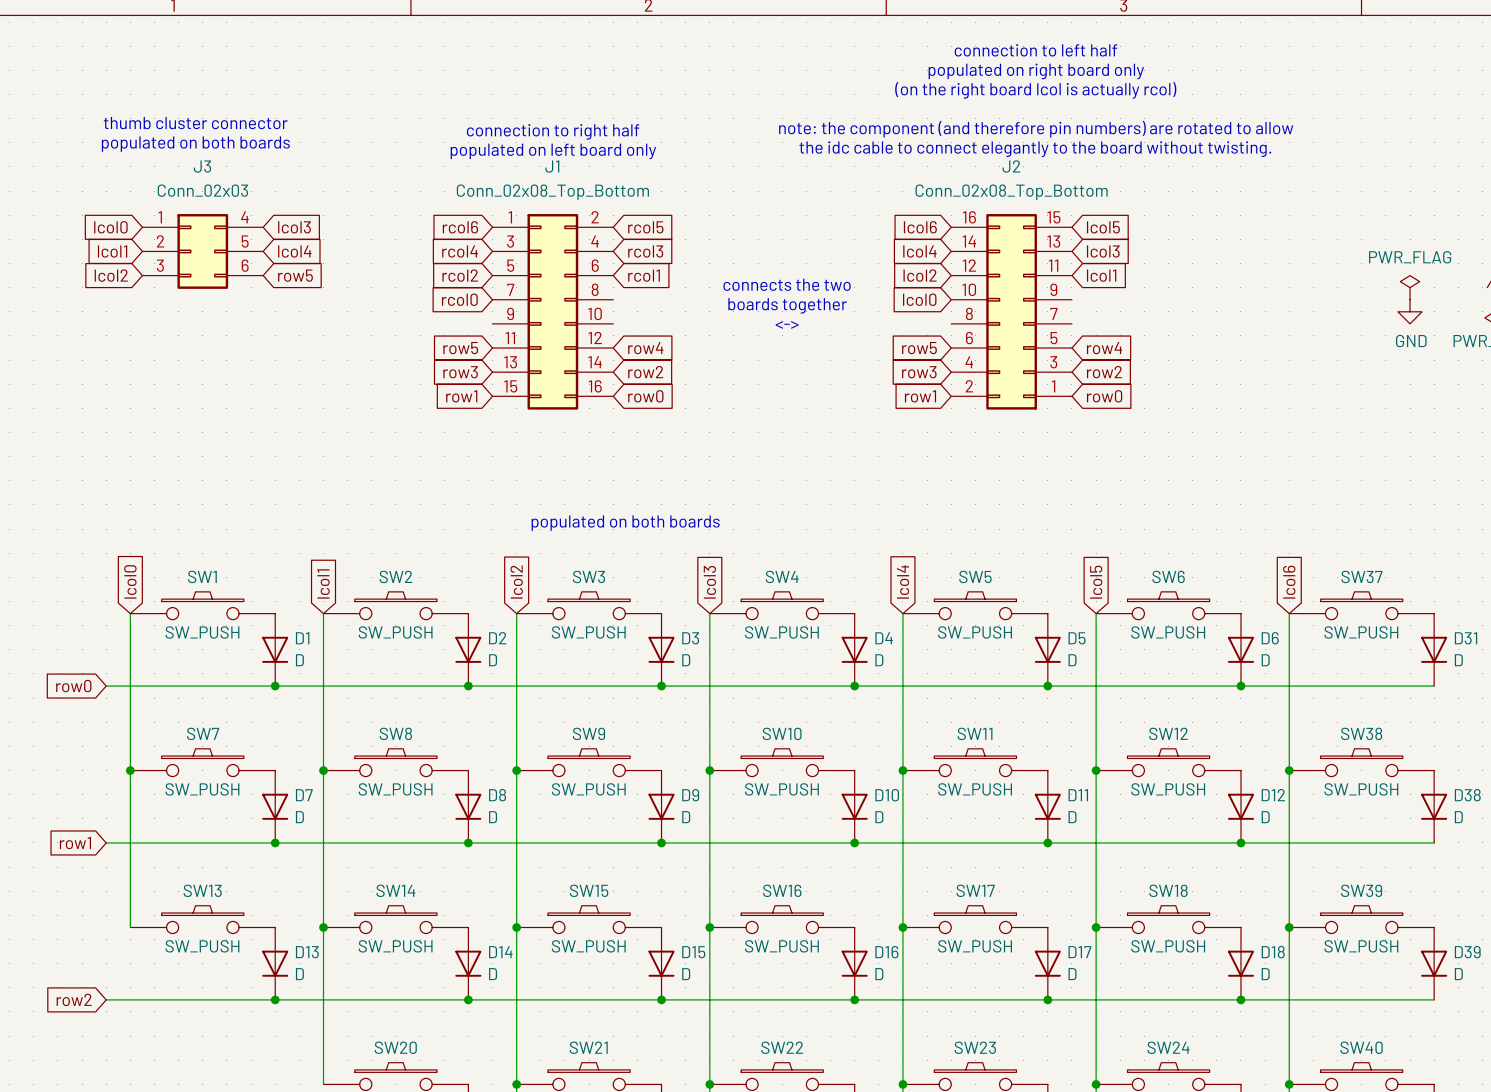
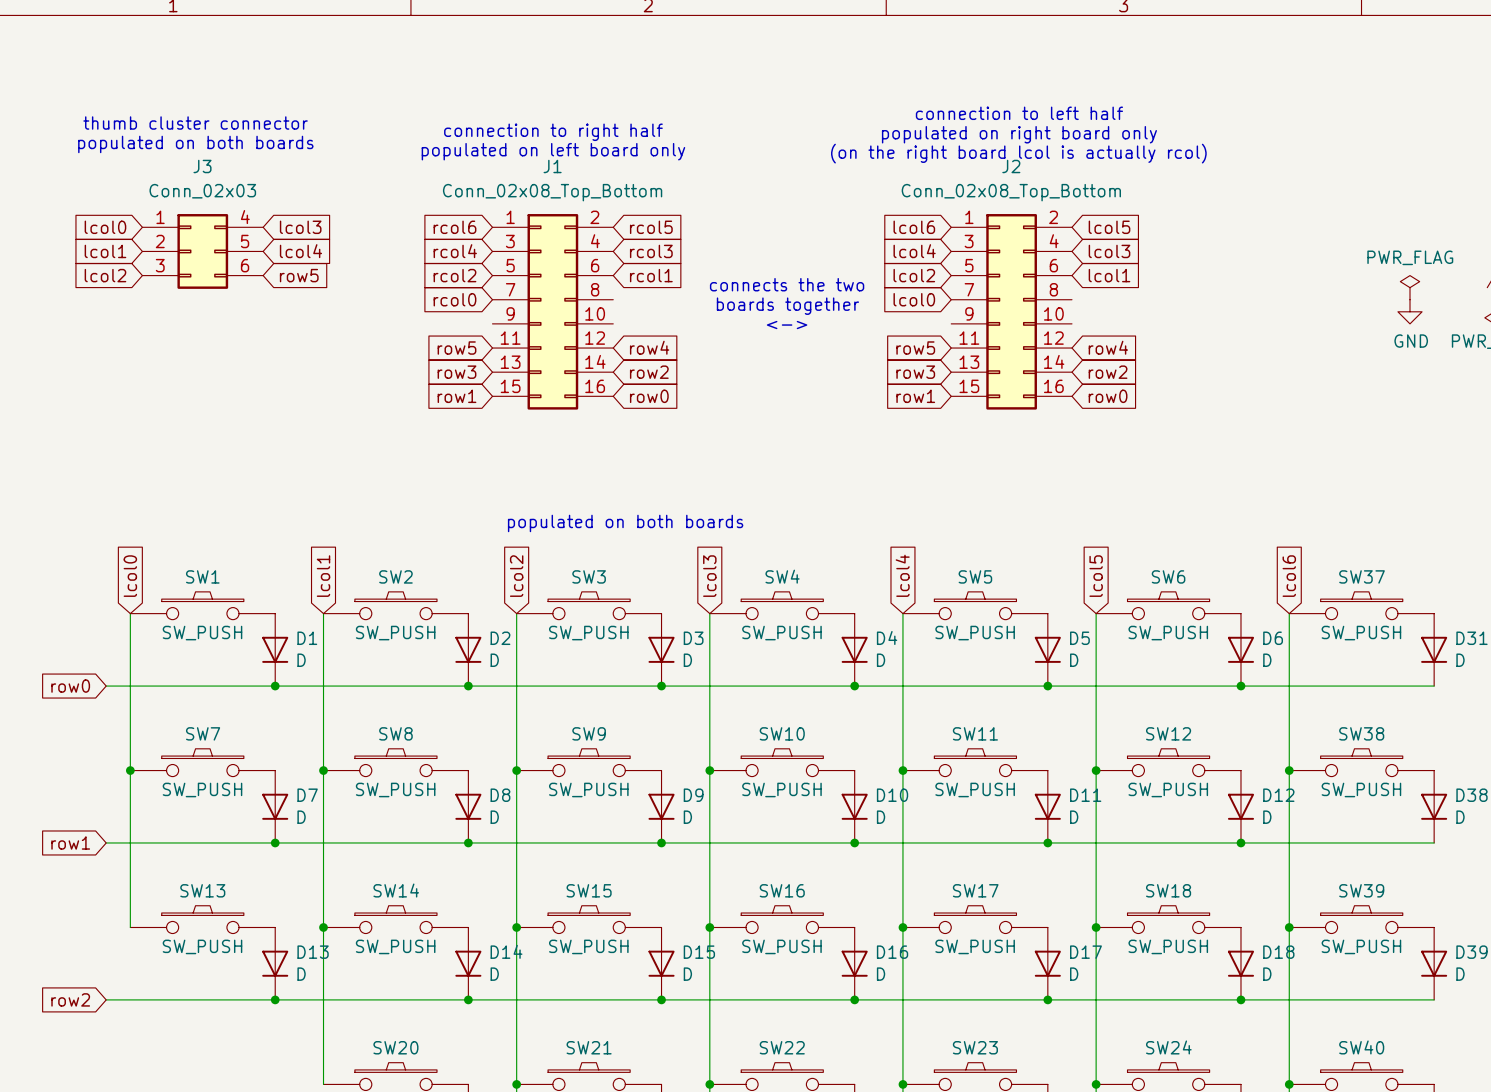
text position: connection to left half (1035, 50) -> connection to left half (1019, 113)
text position: populated on right board only (1036, 71) -> populated on right board only (1019, 134)
text position: (on the right board lcol is actually rcol) (1035, 90) -> (on the right board lcol is actually rcol) (1018, 153)
text: note: the component (and therefore pin numbers) are rotated to allow (1036, 129) -> none
text: the idc cable to connect elegantly to the board without twisting. (1035, 149) -> none
J2 rotation: 0° (1011, 311) -> 180° (1011, 311)

